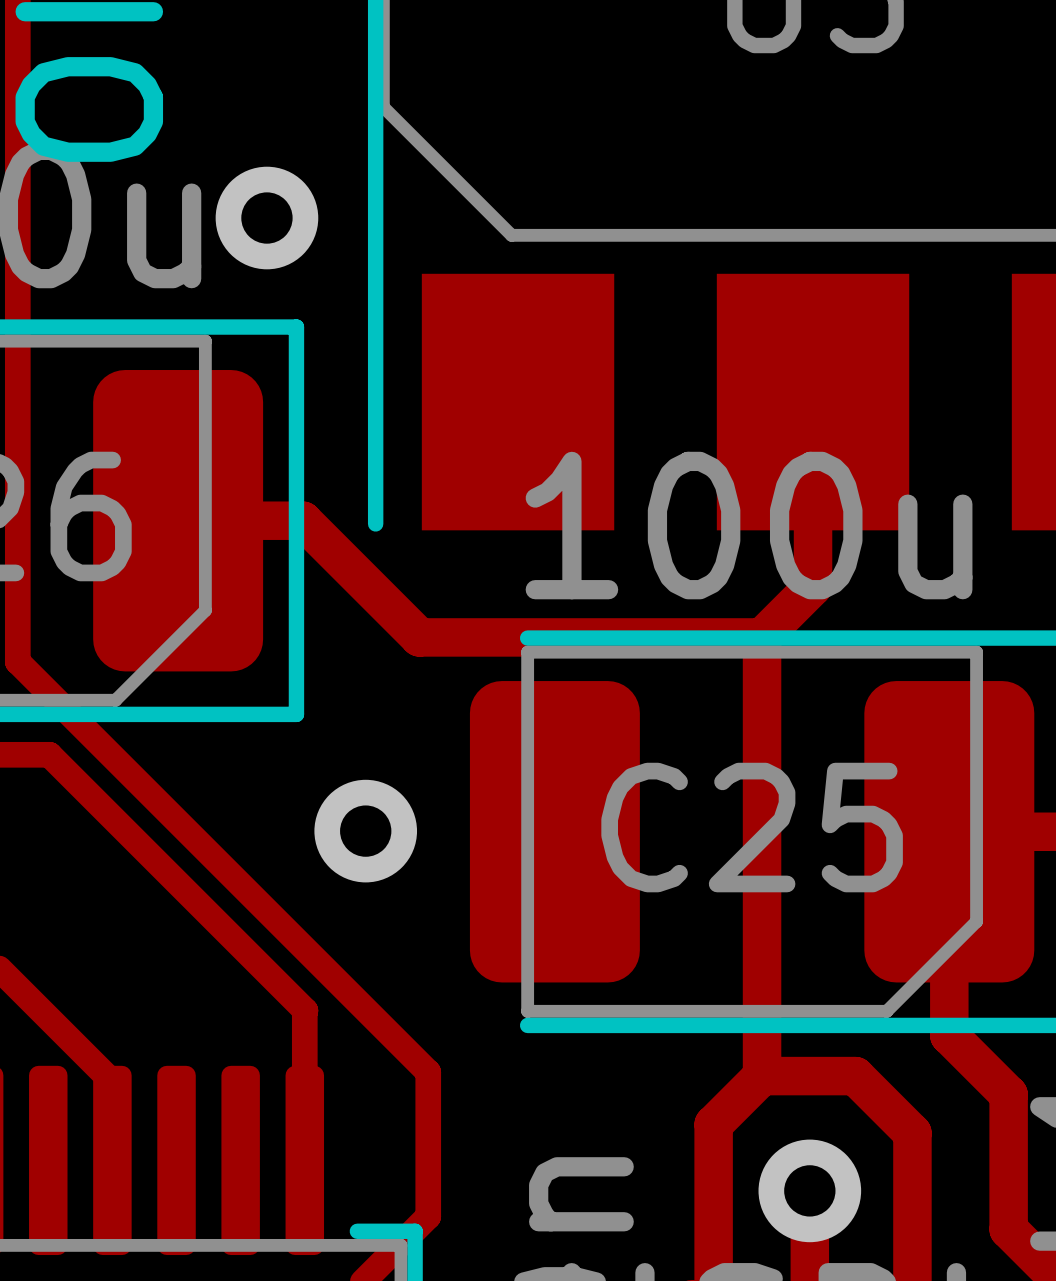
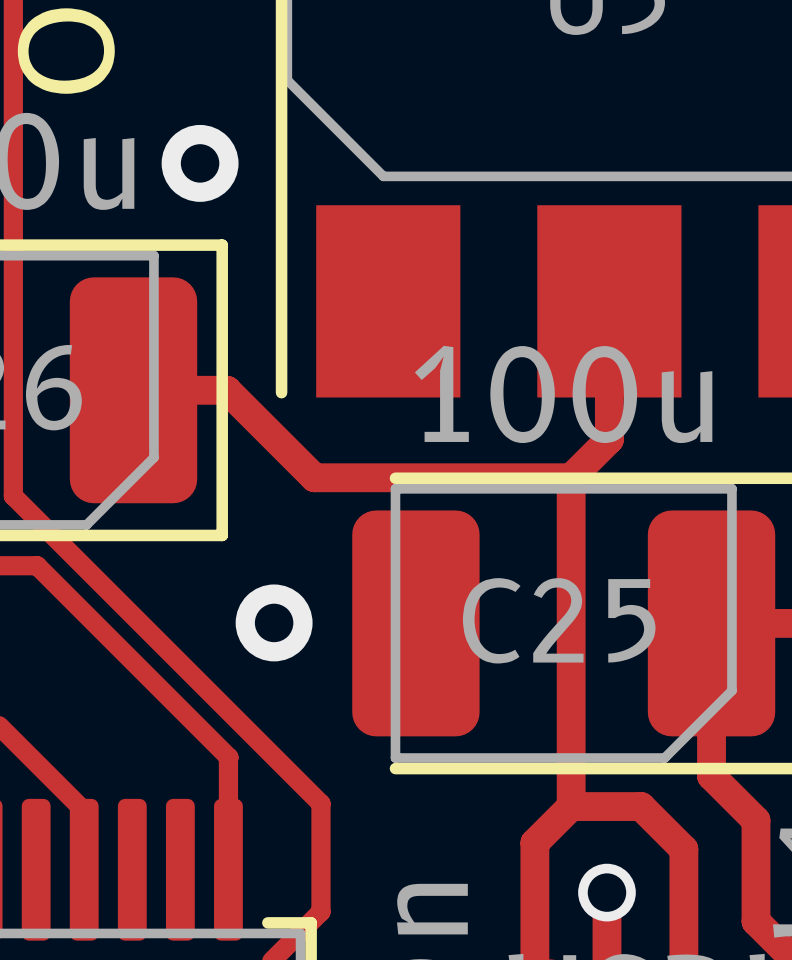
via size: [758, 1139, 862, 1243] -> [578, 863, 636, 922]

